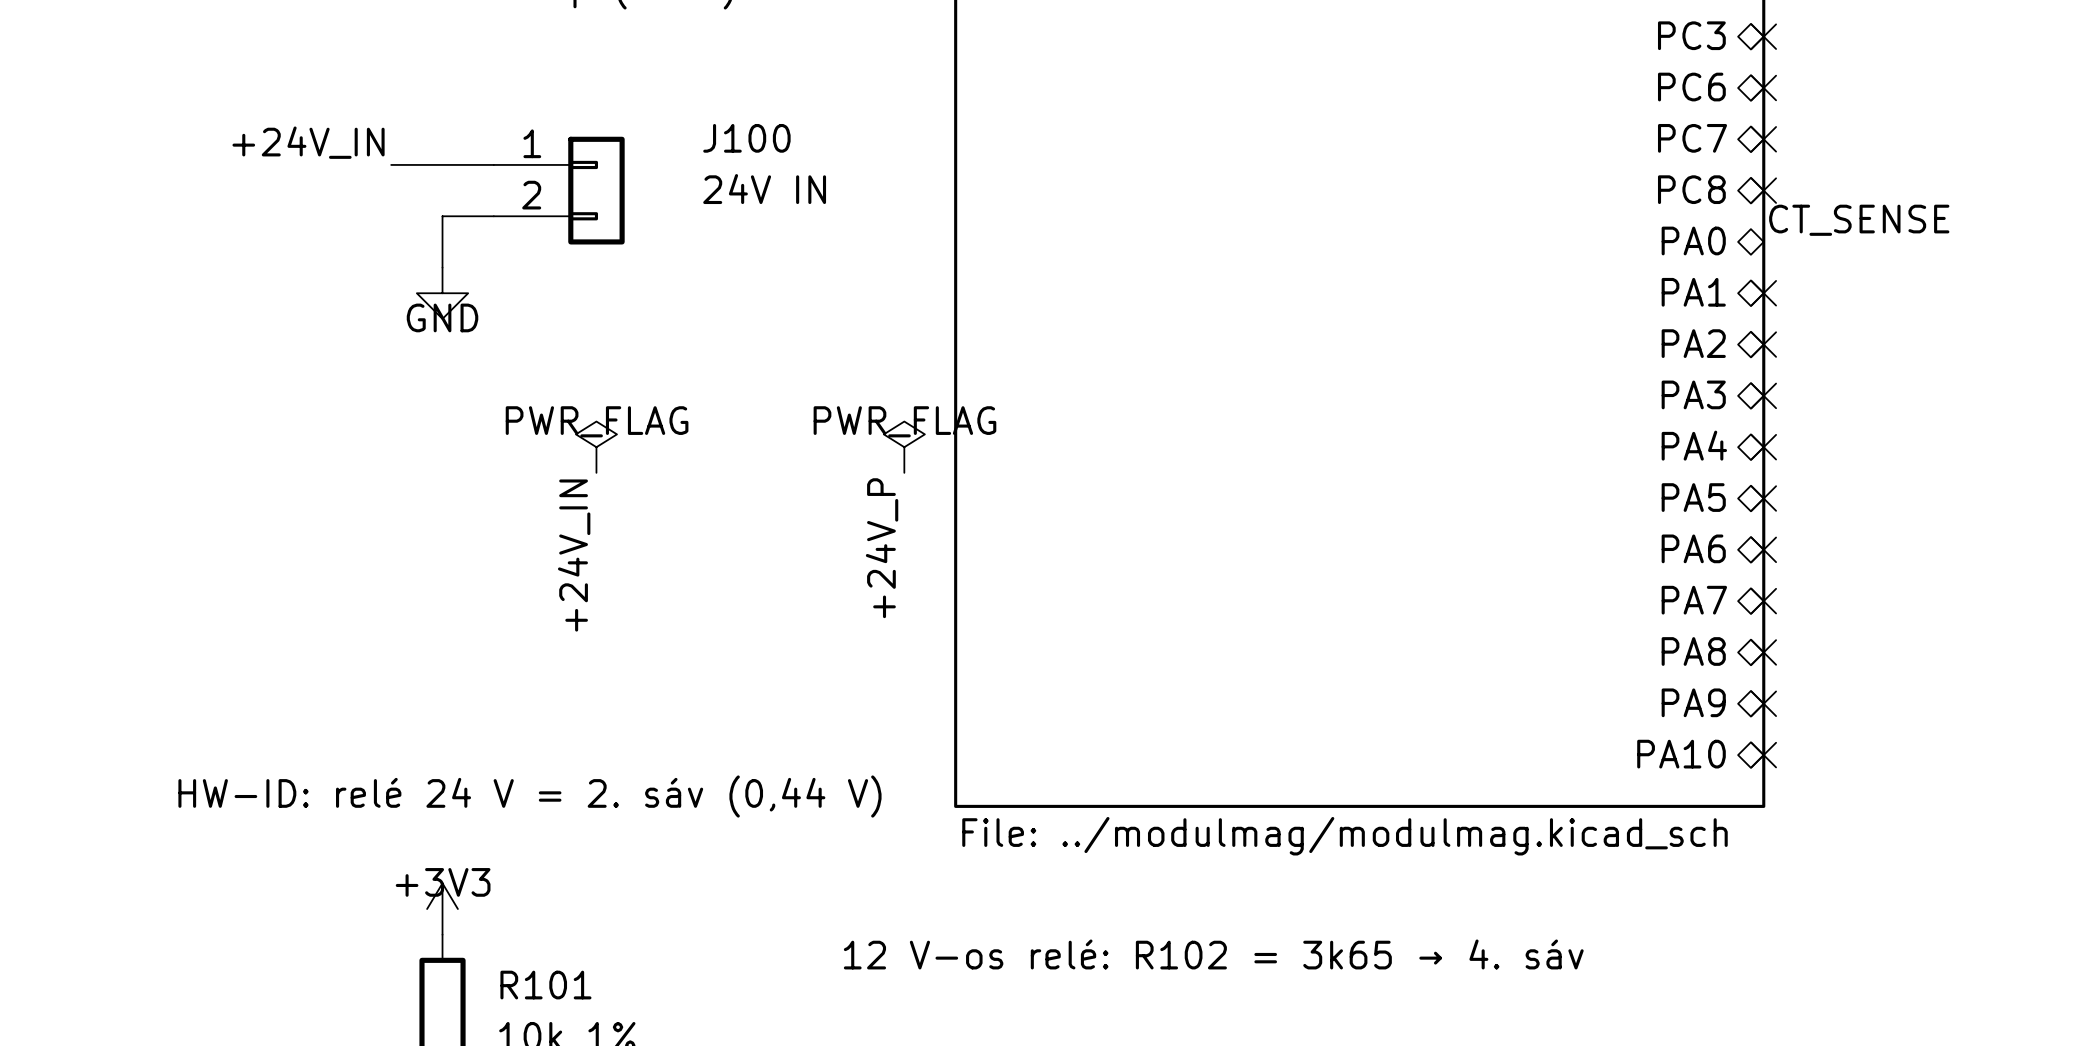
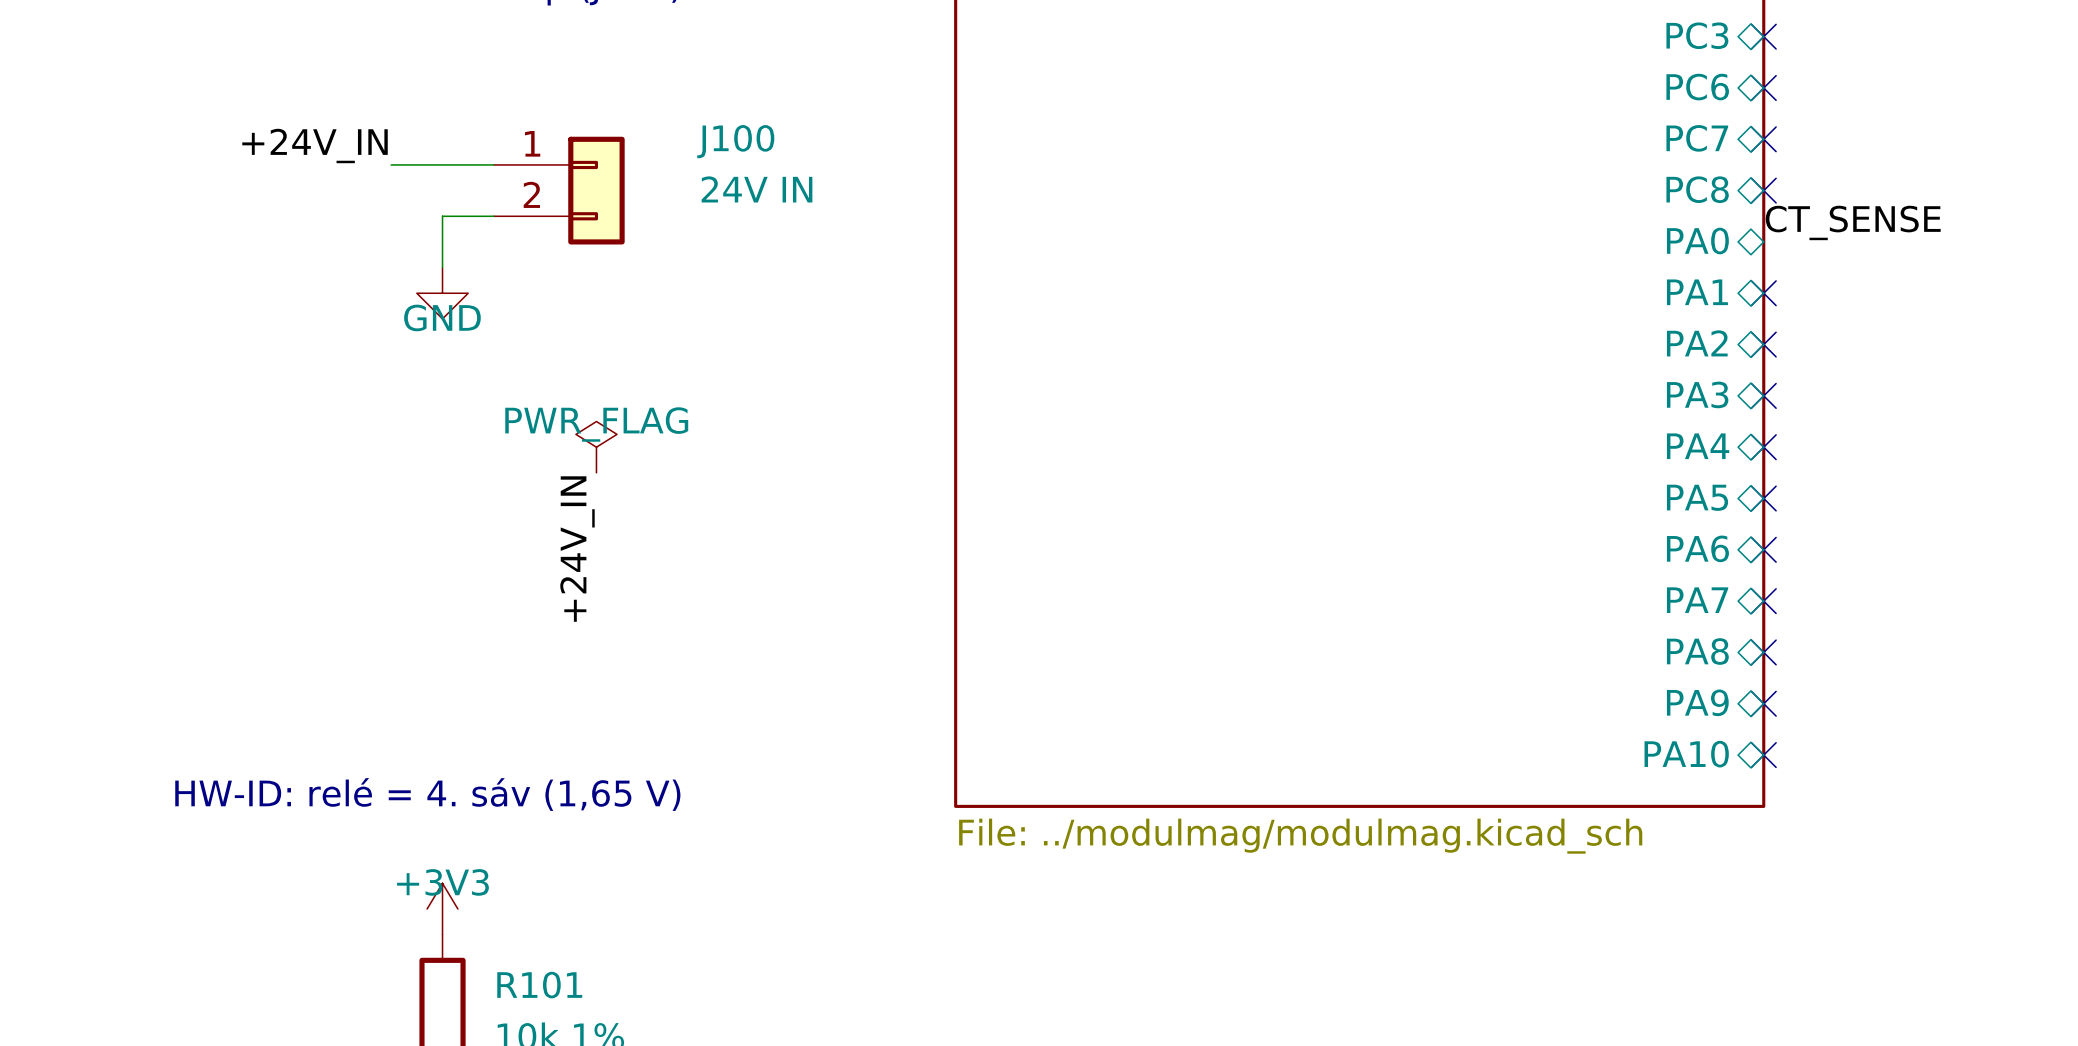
power symbol: PWR_FLAG (904, 447) -> none
label: +24V_P (882, 548) -> none
text: HW-ID: relé 24 V = 2. sáv (0,44 V) (529, 796) -> HW-ID: relé = 4. sáv (1,65 V) (427, 794)
text: 12 V-os relé: R102 = 3k65 → 4. sáv (1213, 954) -> none

